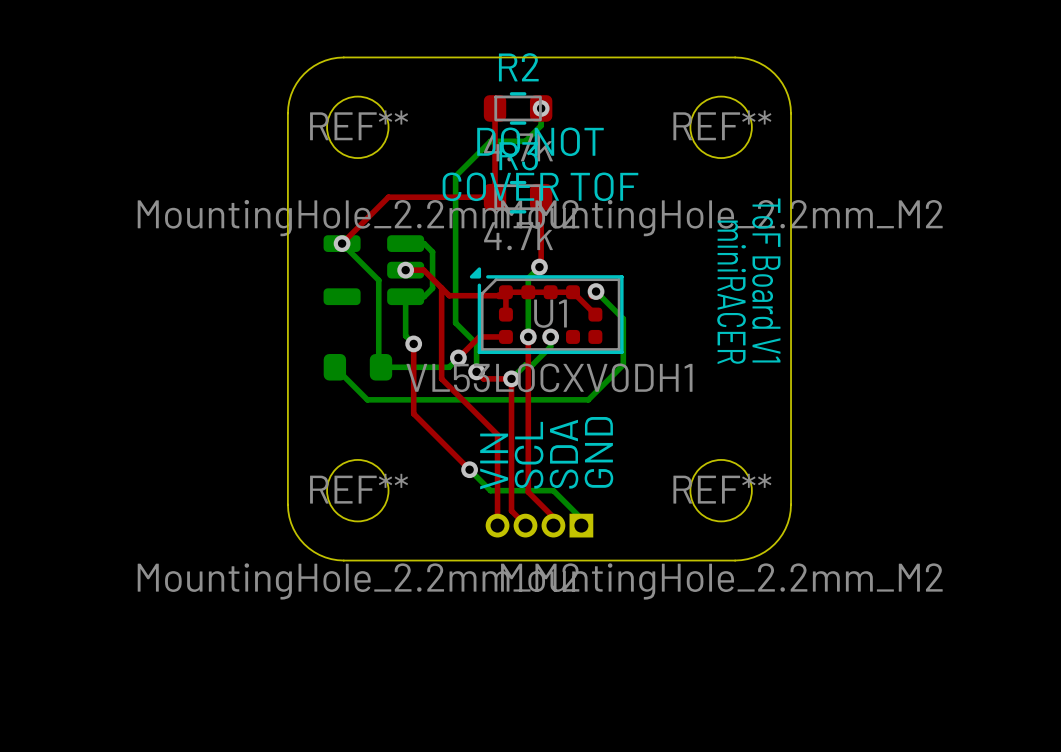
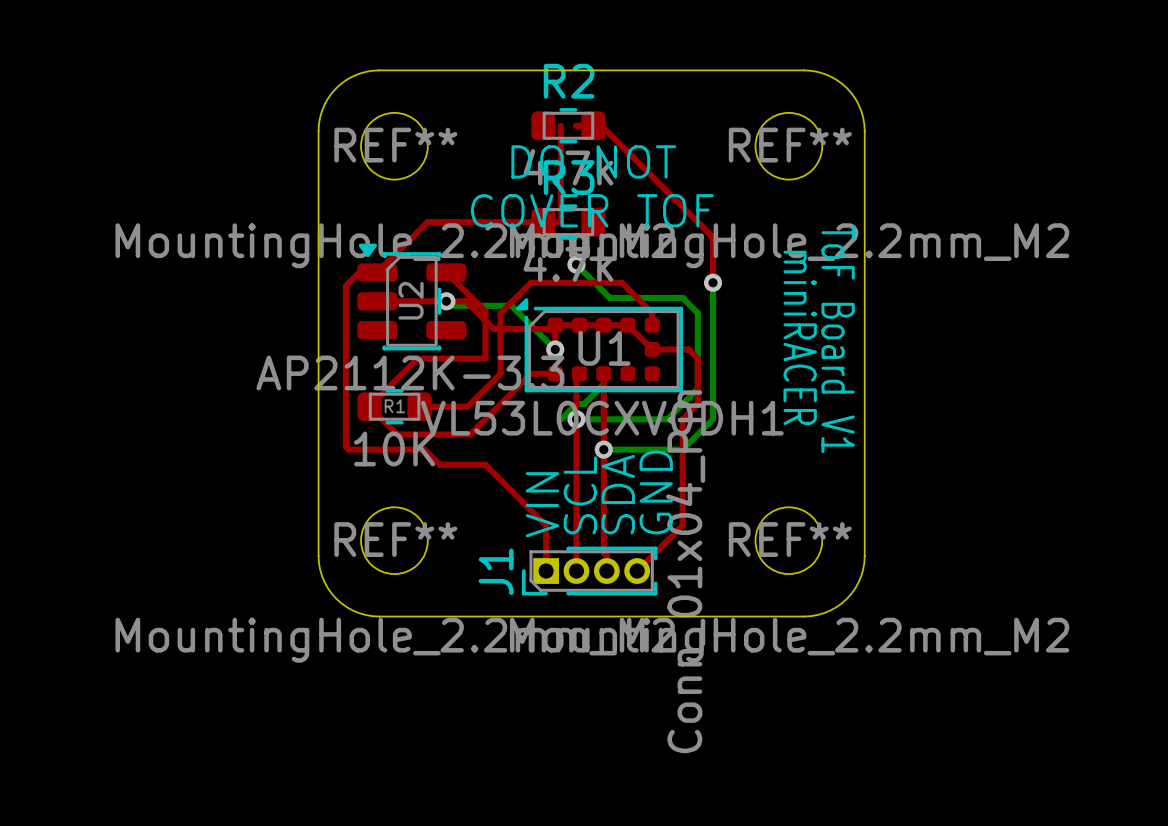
top track: (495, 108) (495, 197) -> (560, 125) (560, 222) (543, 222)
top track: none -> (576, 125) (601, 125) (713, 237) (713, 282)
bottom track: (541, 108) (541, 125) (525, 141) (490, 141) (455, 176) (455, 322) (476, 343) (476, 371) -> none
via: (541, 108) -> none
top track: (541, 197) (541, 265) (539, 267) -> none
via: none -> (576, 264)
bottom track: (342, 243) (378, 280) (378, 365) (381, 367) (449, 367) (458, 357) -> none
via: (342, 243) -> none
top track: none -> (446, 272) (485, 311) (485, 320)
bottom track: (405, 243) (424, 243) (432, 251) (432, 288) (424, 296) (405, 296) (405, 335) (413, 343) -> none
bottom track: none -> (713, 282) (713, 419) (682, 449) (603, 449)
via: none -> (713, 282)
bottom track: (539, 267) (528, 278) (528, 336) -> none
via: (539, 267) -> none
top track: none -> (377, 301) (446, 301)
U2 side: bottom (373, 270) -> top (411, 297)
bottom track: none -> (454, 305) (511, 305) (555, 349)
bottom track: (596, 291) (623, 318) (623, 364) -> (576, 264) (609, 297) (682, 297) (697, 313) (697, 388) (682, 404)
via: (596, 291) -> none
top track: none -> (652, 325) (652, 313) (621, 282) (530, 282) (500, 313) (500, 373) (467, 406) (419, 406)
via: none -> (555, 349)
top track: none -> (652, 349) (688, 349) (697, 358) (697, 404) (682, 419) (682, 525) (637, 571)
top track: (441, 322) (441, 378) (497, 434) (497, 476) -> (377, 272) (359, 272) (345, 285) (345, 446) (348, 449) (424, 449) (439, 464) (485, 464) (546, 525)
top track: (483, 336) (479, 336) (458, 357) -> (530, 373) (470, 434) (397, 434) (369, 406) (417, 358) (485, 358)
top track: (528, 336) (528, 492) (553, 517) -> (603, 373) (603, 552) (606, 555) (606, 569)
top track: none -> (579, 373) (576, 376) (576, 571)
via: (528, 336) -> none
via: (550, 336) -> none
top track: (413, 343) (413, 413) (469, 469) -> none
via: (413, 343) -> none
via: (458, 357) -> none
bottom track: (334, 367) (367, 399) (588, 399) (609, 378) -> (576, 419) (667, 419)
R1 side: bottom (357, 367) -> top (394, 406)
top track: (476, 371) (483, 378) (511, 378) (511, 510) (525, 525) -> none
via: (476, 371) -> none
via position: (511, 378) -> (576, 419)
via: none -> (603, 449)
bottom track: (469, 469) (490, 490) (553, 490) (581, 518) (581, 525) -> none
via: (469, 469) -> none
J1 side: bottom (539, 525) -> top (589, 571)

